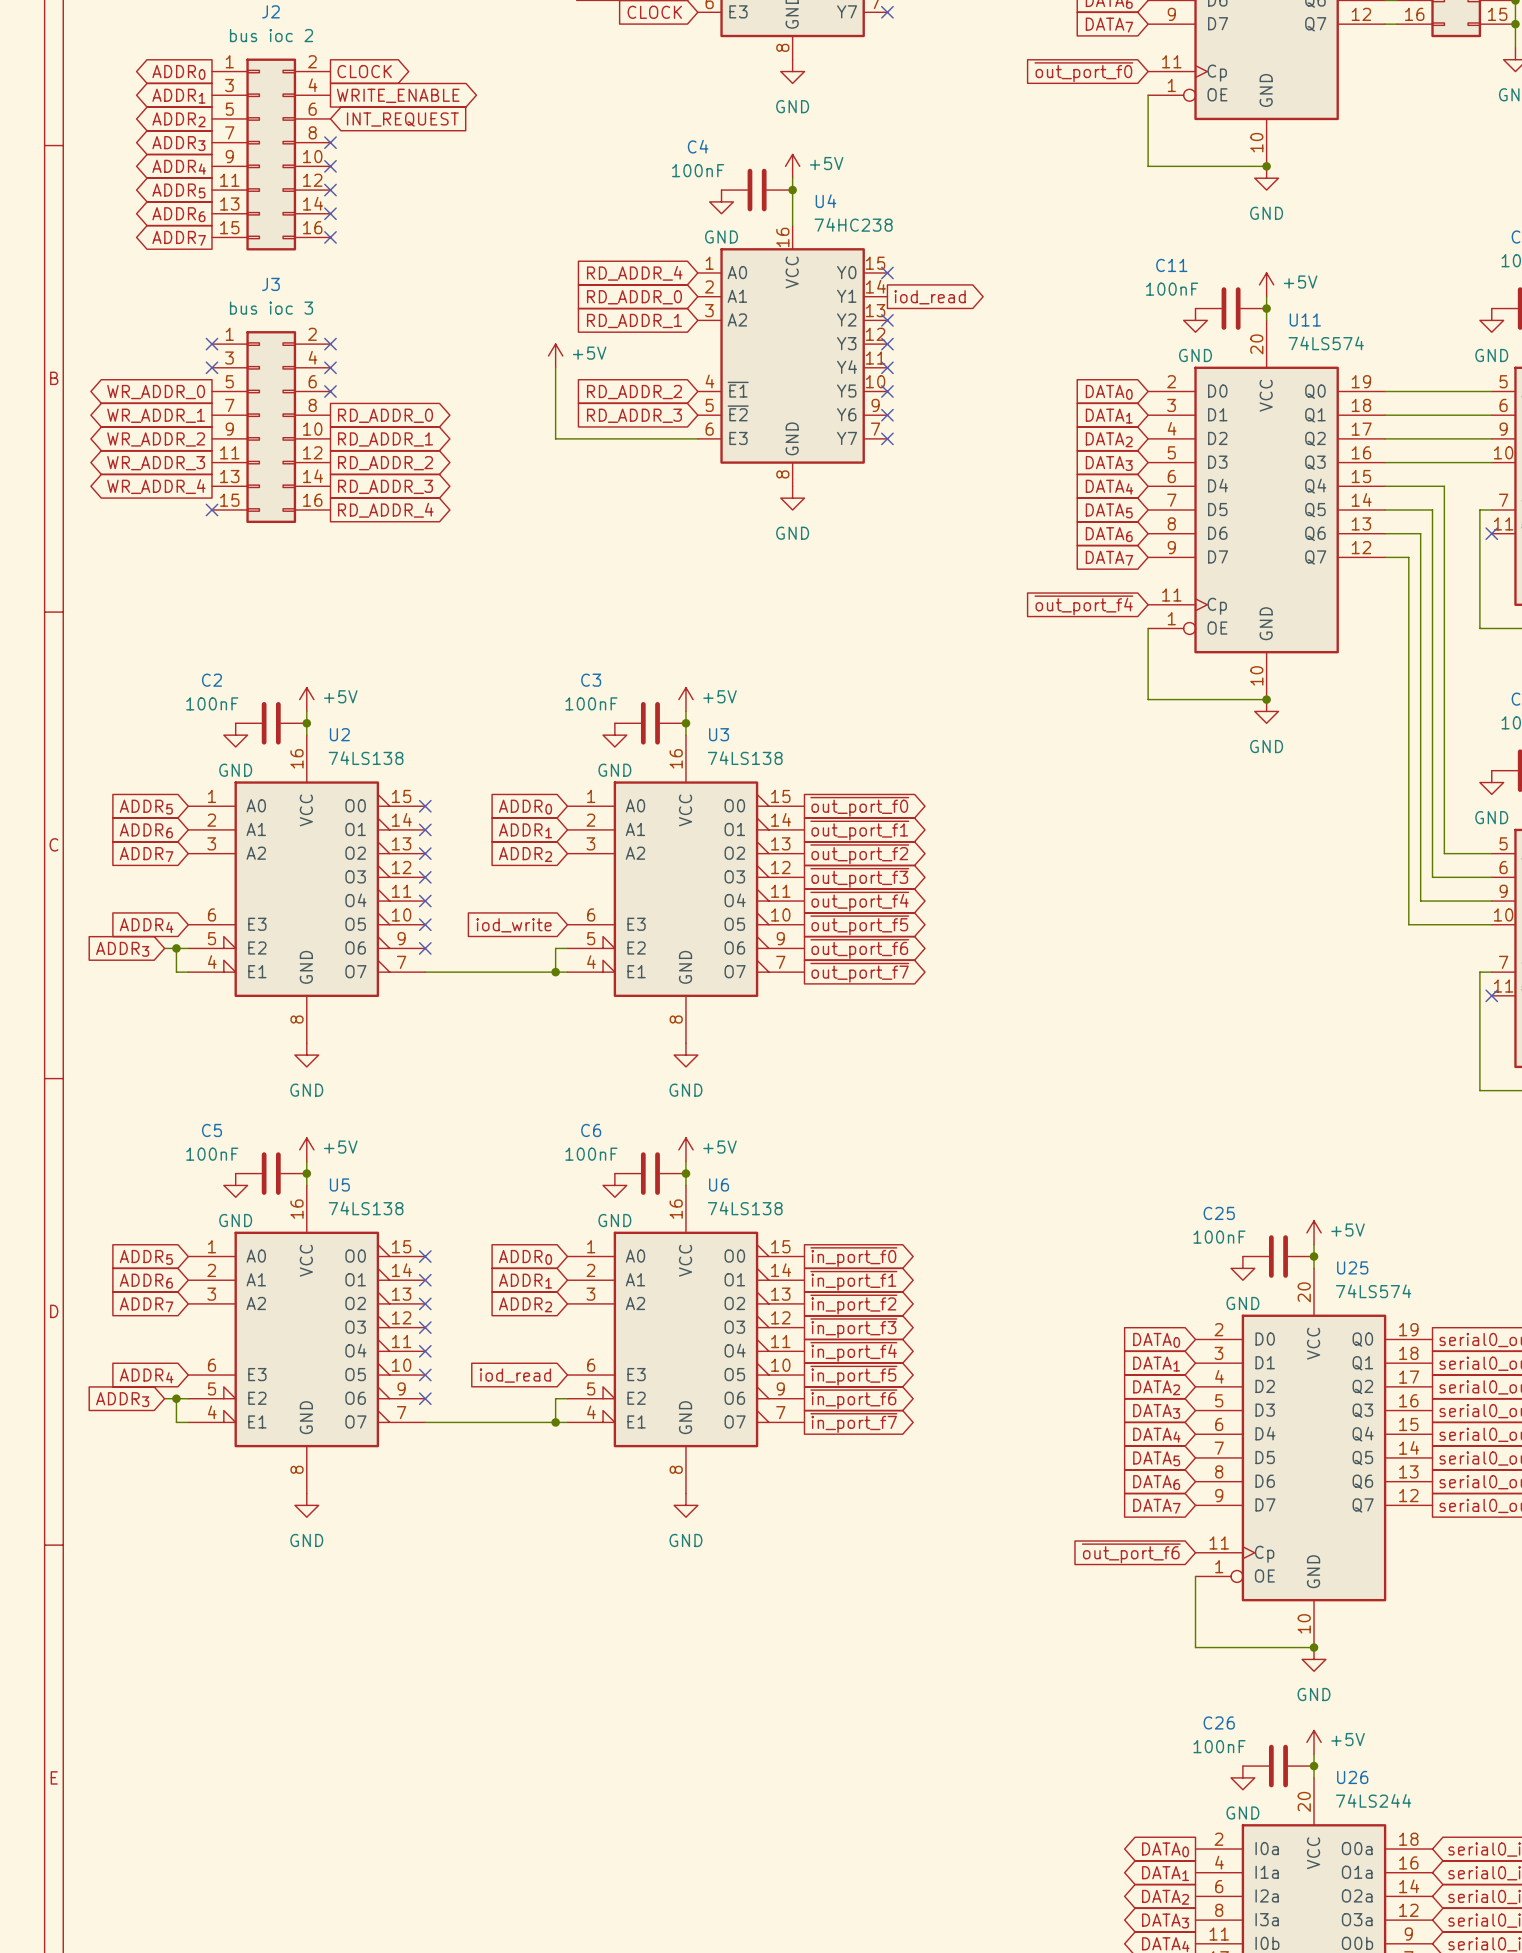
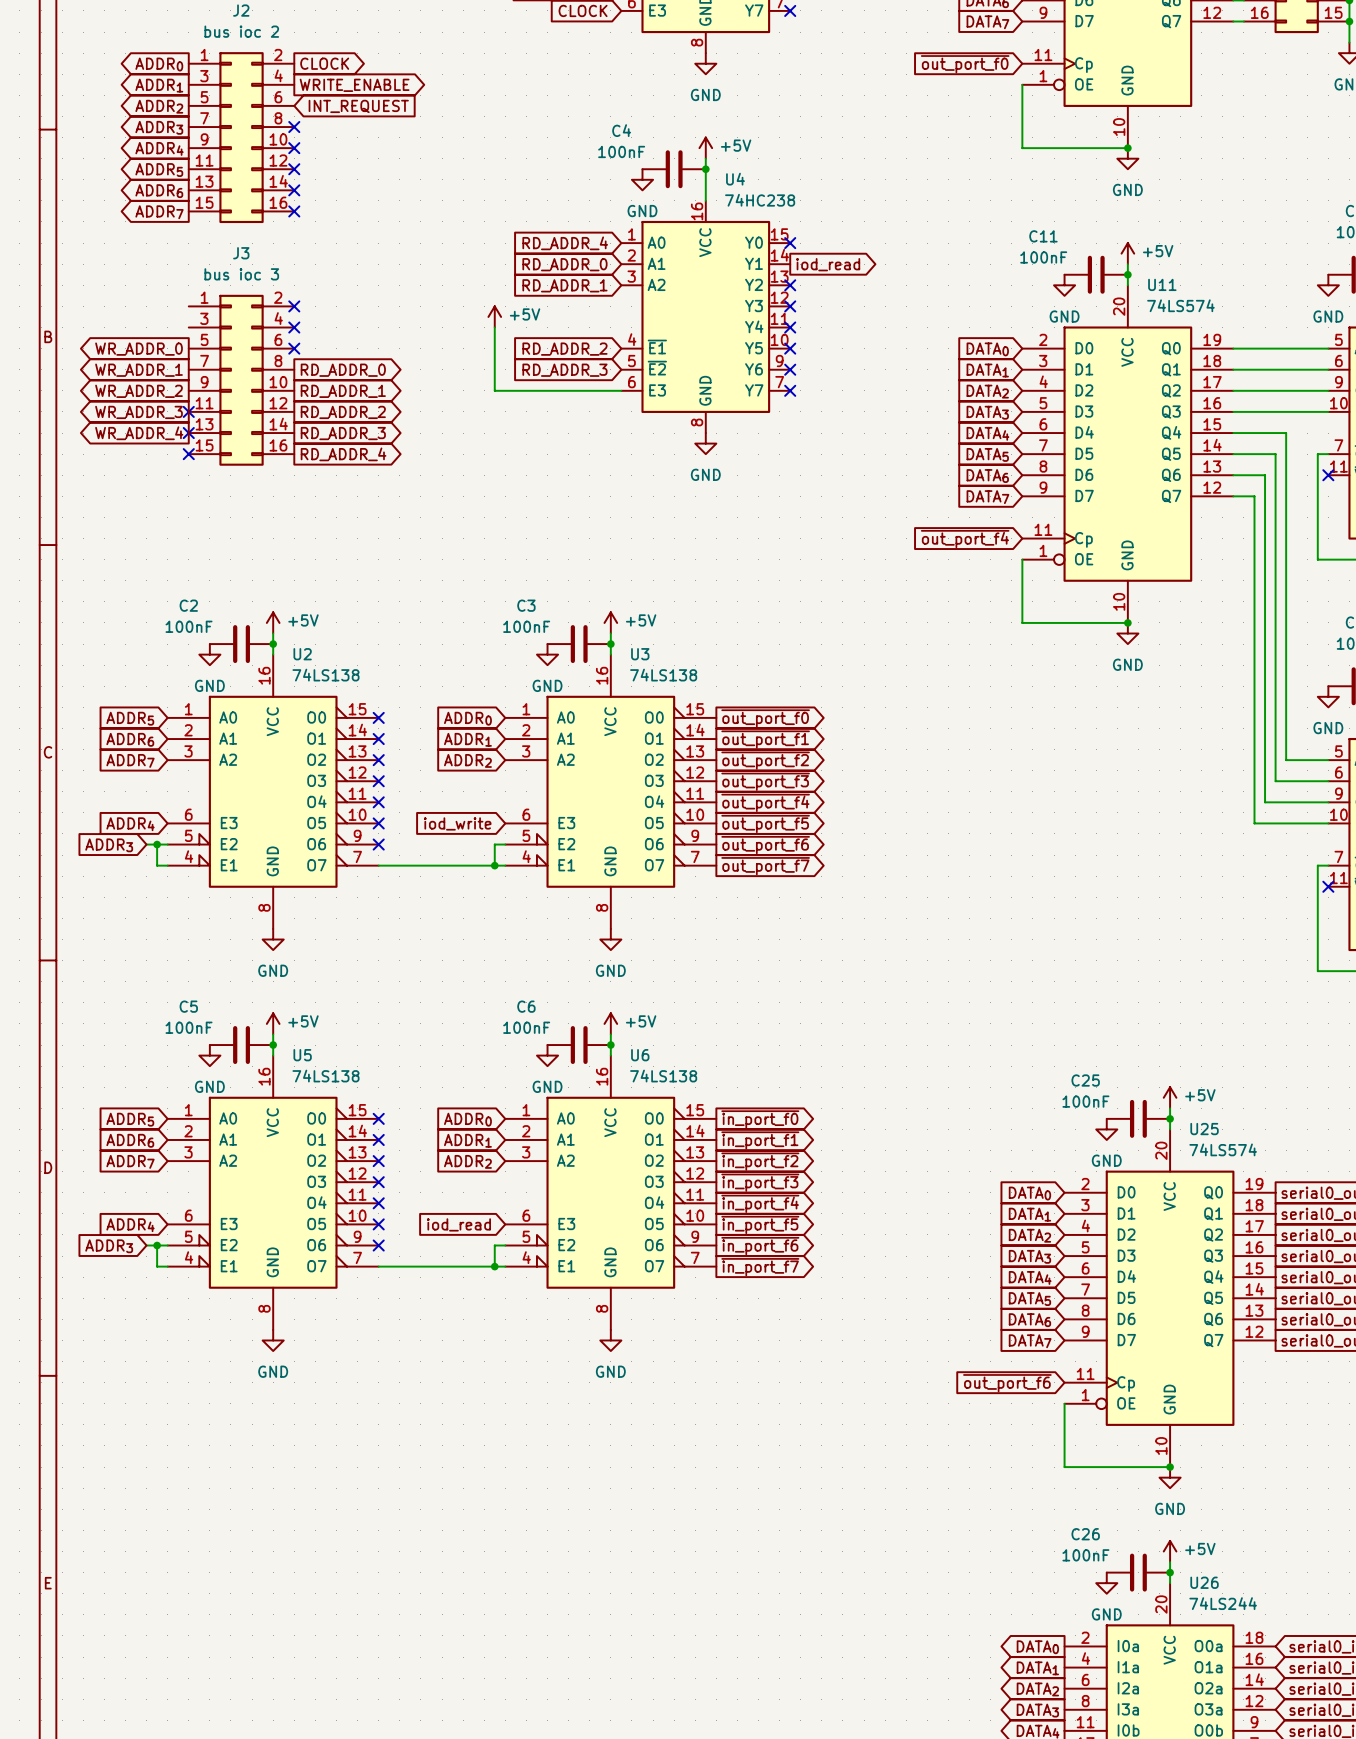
no-connect mark: (211, 344) -> none
no-connect mark: (211, 367) -> none
no-connect mark: none -> (188, 411)
no-connect mark: none -> (188, 433)

